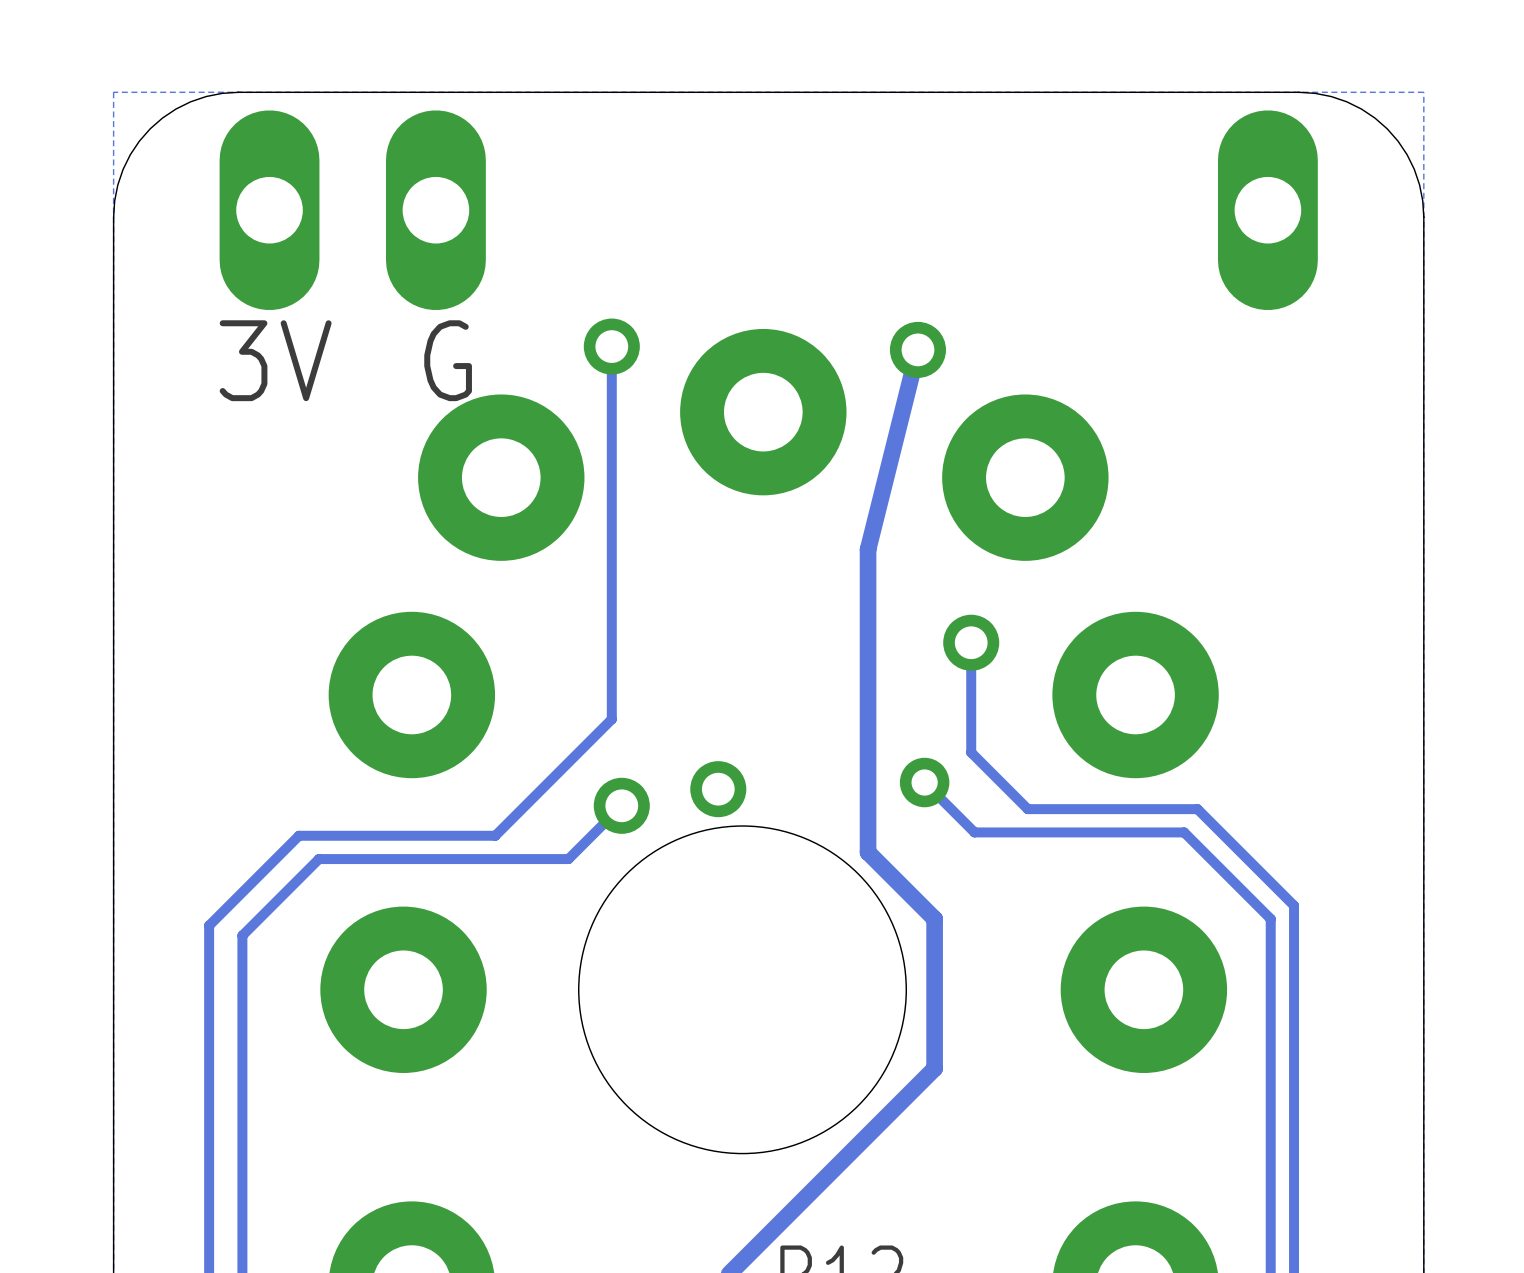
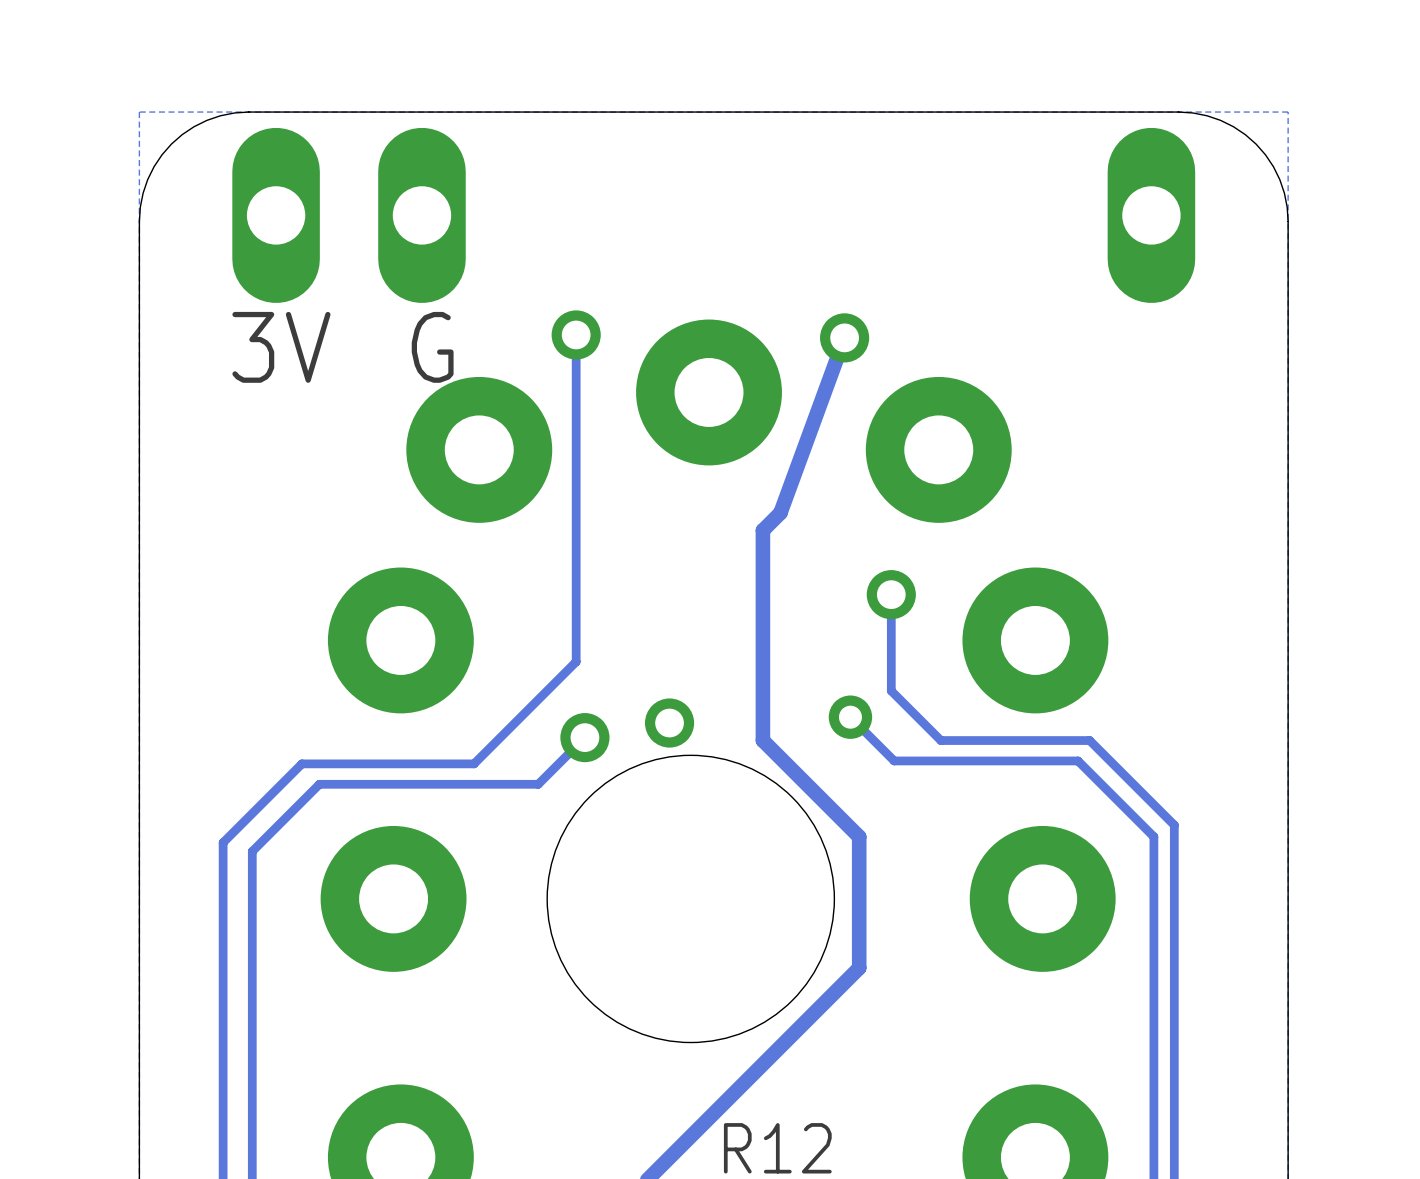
track: (917, 349) (868, 549) (868, 852) -> (844, 337) (780, 512) (762, 530) (762, 740) (800, 778)

